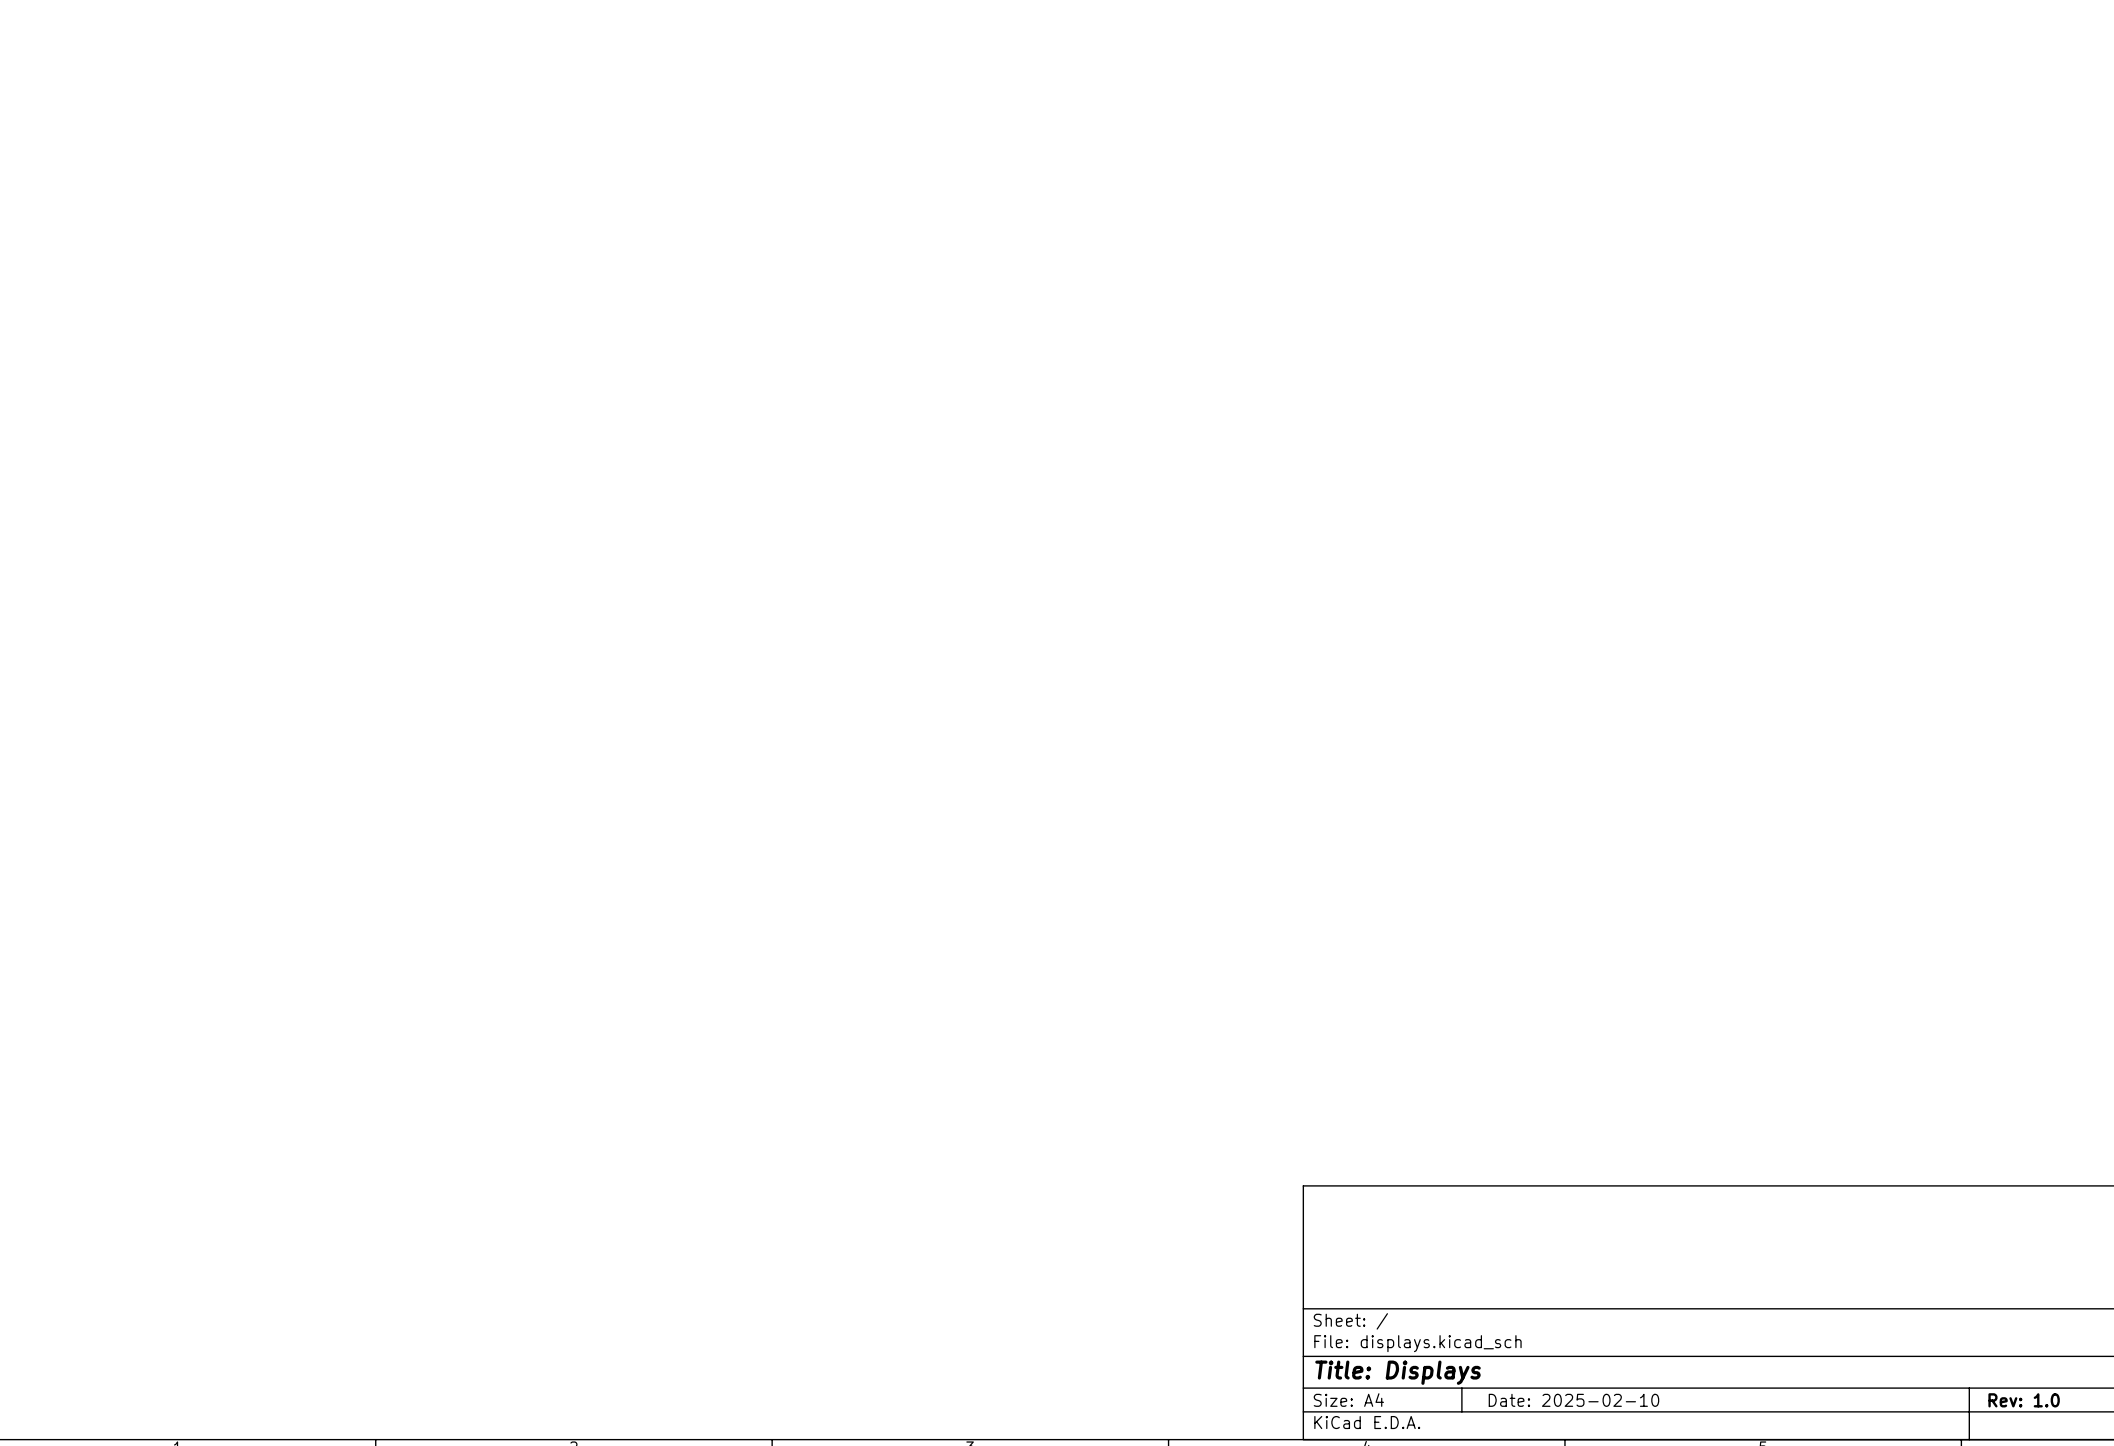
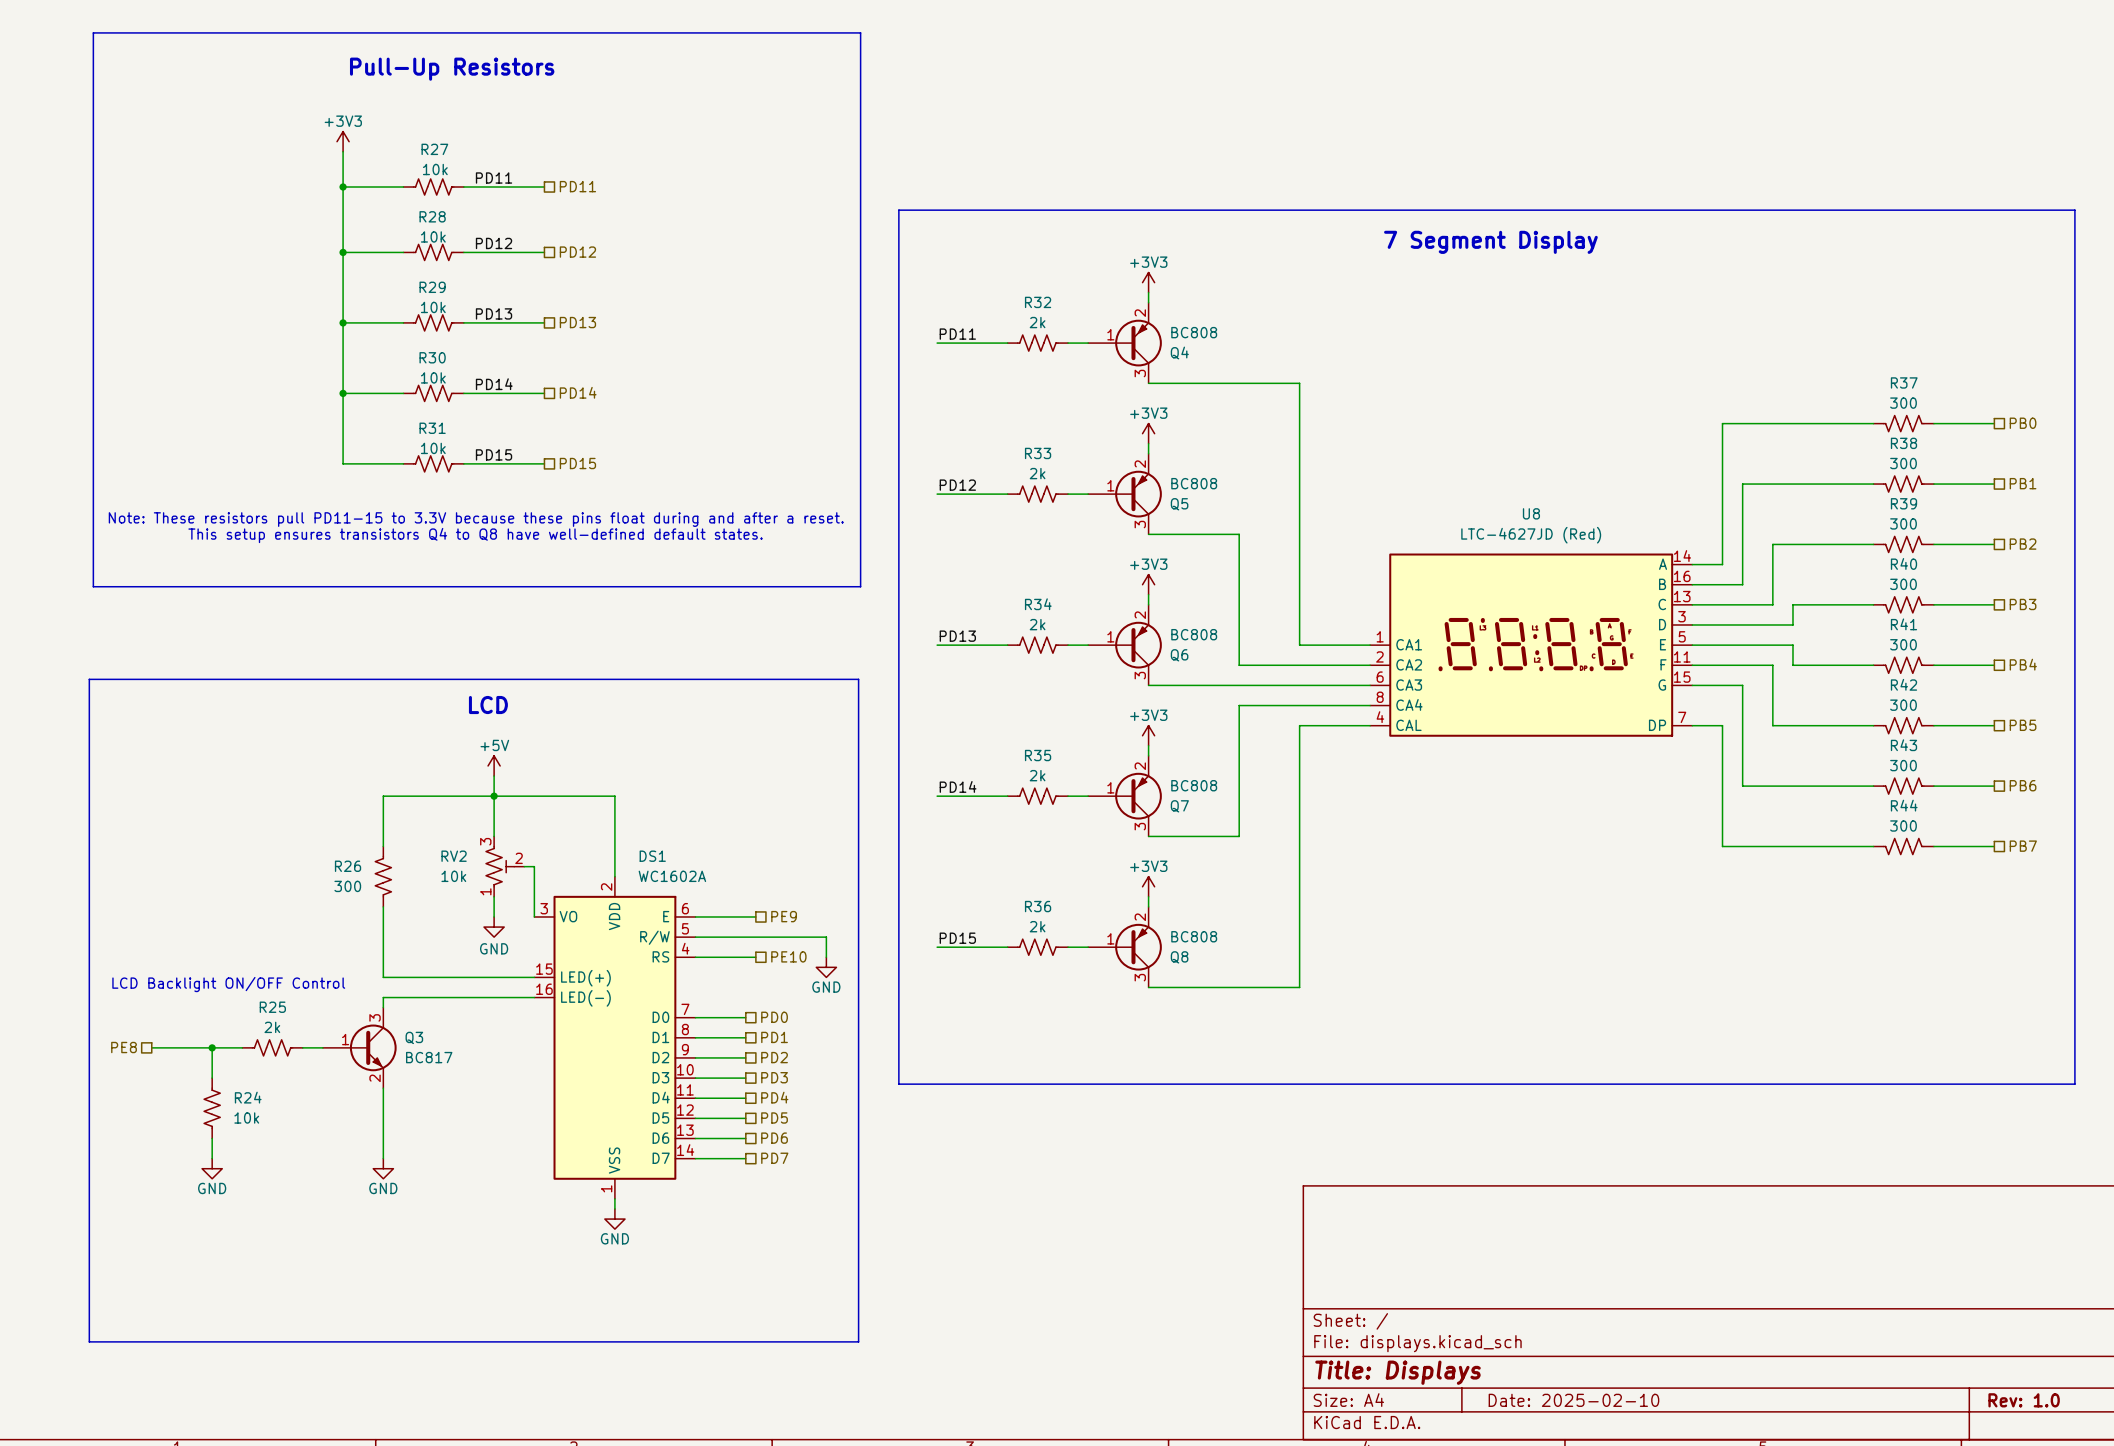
line: none -> (93, 32) (860, 32) (860, 586) (93, 586) (93, 32)
text: none -> Pull-Up Resistors (452, 69)
power symbol: none -> +3V3 (343, 141)
wire: none -> (343, 151) (343, 463) (403, 463)
label: none -> PD11 (494, 178)
hierarchical label: none -> PD11 (577, 186)
wire: none -> (343, 187) (403, 187)
junction: none -> (343, 187)
R27: none -> 10k (433, 187)
wire: none -> (463, 187) (544, 187)
line: none -> (898, 210) (2074, 210) (2074, 1084) (898, 1084) (898, 210)
text: none -> 7 Segment Display (1490, 242)
label: none -> PD12 (494, 243)
wire: none -> (343, 252) (403, 252)
junction: none -> (343, 252)
R28: none -> 10k (433, 252)
wire: none -> (463, 252) (544, 252)
hierarchical label: none -> PD12 (577, 252)
power symbol: none -> +3V3 (1148, 282)
wire: none -> (1148, 292) (1148, 302)
label: none -> PD13 (494, 313)
wire: none -> (343, 322) (403, 322)
junction: none -> (343, 322)
R29: none -> 10k (433, 322)
wire: none -> (463, 322) (544, 322)
hierarchical label: none -> PD13 (577, 322)
label: none -> PD11 (957, 334)
wire: none -> (937, 343) (1007, 343)
R32: none -> 2k (1037, 343)
wire: none -> (1068, 343) (1088, 343)
Q4: none -> BC808 (1125, 343)
wire: none -> (1148, 383) (1299, 383) (1299, 645) (1370, 645)
label: none -> PD14 (494, 384)
hierarchical label: none -> PD14 (578, 392)
wire: none -> (343, 393) (403, 393)
junction: none -> (343, 393)
R30: none -> 10k (433, 393)
wire: none -> (463, 393) (544, 393)
wire: none -> (1873, 423) (1722, 423) (1722, 564) (1692, 564)
R37: none -> 300 (1903, 423)
wire: none -> (1933, 423) (1994, 423)
hierarchical label: none -> PB0 (2023, 423)
power symbol: none -> +3V3 (1148, 433)
wire: none -> (1148, 443) (1148, 453)
label: none -> PD15 (494, 454)
R31: none -> 10k (433, 463)
wire: none -> (463, 463) (544, 463)
hierarchical label: none -> PD15 (577, 463)
hierarchical label: none -> PB1 (2023, 483)
wire: none -> (1873, 484) (1742, 484) (1742, 584) (1692, 584)
R38: none -> 300 (1903, 484)
wire: none -> (1933, 484) (1994, 484)
label: none -> PD12 (957, 485)
wire: none -> (937, 494) (1007, 494)
R33: none -> 2k (1037, 494)
wire: none -> (1068, 494) (1088, 494)
Q5: none -> BC808 (1125, 494)
text: none -> Note: These resistors pull PD11-15 to 3.3V because these pins float during and after a reset. (476, 519)
wire: none -> (1148, 534) (1239, 534) (1239, 665) (1370, 665)
text: none -> This setup ensures transistors Q4 to Q8 have well-defined default states. (475, 535)
wire: none -> (1873, 544) (1772, 544) (1772, 604) (1692, 604)
R39: none -> 300 (1903, 544)
wire: none -> (1933, 544) (1994, 544)
hierarchical label: none -> PB2 (2023, 544)
power symbol: none -> +3V3 (1148, 584)
wire: none -> (1148, 594) (1148, 604)
wire: none -> (1873, 604) (1792, 604) (1792, 624) (1692, 624)
R40: none -> 300 (1903, 604)
wire: none -> (1933, 604) (1994, 604)
hierarchical label: none -> PB3 (2023, 604)
label: none -> PD13 (957, 636)
wire: none -> (937, 645) (1007, 645)
R34: none -> 2k (1037, 645)
wire: none -> (1068, 645) (1088, 645)
Q6: none -> BC808 (1125, 645)
U8: none -> LTC-4627JD (Red) (1531, 645)
wire: none -> (1692, 645) (1792, 645) (1792, 665) (1873, 665)
hierarchical label: none -> PB4 (2023, 664)
wire: none -> (1692, 665) (1772, 665) (1772, 725) (1873, 725)
R41: none -> 300 (1903, 665)
wire: none -> (1933, 665) (1994, 665)
line: none -> (89, 679) (858, 679) (858, 1341) (89, 1341) (89, 679)
wire: none -> (1148, 685) (1370, 685)
wire: none -> (1692, 685) (1742, 685) (1742, 786) (1873, 786)
text: none -> LCD (488, 705)
wire: none -> (1370, 705) (1239, 705) (1239, 836) (1148, 836)
wire: none -> (1370, 725) (1299, 725) (1299, 987) (1148, 987)
wire: none -> (1692, 725) (1722, 725) (1722, 846) (1873, 846)
R42: none -> 300 (1903, 725)
wire: none -> (1933, 725) (1994, 725)
hierarchical label: none -> PB5 (2023, 725)
power symbol: none -> +3V3 (1148, 735)
wire: none -> (1148, 745) (1148, 755)
power symbol: none -> +5V (494, 765)
wire: none -> (494, 776) (494, 836)
hierarchical label: none -> PB6 (2023, 785)
label: none -> PD14 (958, 786)
R43: none -> 300 (1903, 786)
wire: none -> (1933, 786) (1994, 786)
junction: none -> (494, 796)
wire: none -> (937, 796) (1007, 796)
R35: none -> 2k (1037, 796)
wire: none -> (1068, 796) (1088, 796)
Q7: none -> BC808 (1125, 796)
wire: none -> (383, 846) (383, 796) (614, 796) (614, 876)
R44: none -> 300 (1903, 846)
wire: none -> (1933, 846) (1994, 846)
hierarchical label: none -> PB7 (2023, 846)
RV2: none -> 10k (505, 866)
wire: none -> (524, 866) (534, 866) (534, 916)
R26: none -> 300 (383, 876)
power symbol: none -> +3V3 (1148, 886)
wire: none -> (494, 896) (494, 916)
wire: none -> (1148, 896) (1148, 906)
wire: none -> (383, 906) (383, 977) (534, 977)
wire: none -> (695, 916) (755, 916)
hierarchical label: none -> PE9 (784, 916)
power symbol: none -> GND (494, 927)
wire: none -> (695, 937) (826, 937) (826, 957)
label: none -> PD15 (957, 938)
wire: none -> (937, 947) (1007, 947)
R36: none -> 2k (1037, 947)
wire: none -> (1068, 947) (1088, 947)
Q8: none -> BC808 (1125, 947)
hierarchical label: none -> PE10 (788, 956)
wire: none -> (695, 957) (755, 957)
power symbol: none -> GND (826, 967)
text: none -> LCD Backlight ON/OFF Control (228, 984)
wire: none -> (534, 997) (383, 997) (383, 1007)
wire: none -> (695, 1017) (745, 1017)
hierarchical label: none -> PD0 (774, 1017)
DS1: none -> WC1602A (614, 1037)
wire: none -> (695, 1037) (745, 1037)
hierarchical label: none -> PD1 (774, 1037)
hierarchical label: none -> PE8 (124, 1047)
wire: none -> (151, 1047) (242, 1047)
wire: none -> (212, 1047) (212, 1078)
junction: none -> (212, 1047)
R25: none -> 2k (272, 1047)
wire: none -> (302, 1047) (322, 1047)
Q3: none -> BC817 (359, 1047)
wire: none -> (695, 1057) (745, 1057)
hierarchical label: none -> PD2 (774, 1057)
hierarchical label: none -> PD3 (774, 1077)
wire: none -> (695, 1078) (745, 1078)
wire: none -> (383, 1088) (383, 1158)
hierarchical label: none -> PD4 (774, 1097)
wire: none -> (695, 1098) (745, 1098)
R24: none -> 10k (212, 1108)
hierarchical label: none -> PD5 (774, 1117)
wire: none -> (695, 1118) (745, 1118)
wire: none -> (212, 1138) (212, 1158)
wire: none -> (695, 1138) (745, 1138)
hierarchical label: none -> PD6 (774, 1138)
wire: none -> (695, 1158) (745, 1158)
hierarchical label: none -> PD7 (774, 1158)
power symbol: none -> GND (212, 1168)
power symbol: none -> GND (383, 1168)
wire: none -> (614, 1198) (614, 1208)
power symbol: none -> GND (614, 1219)

